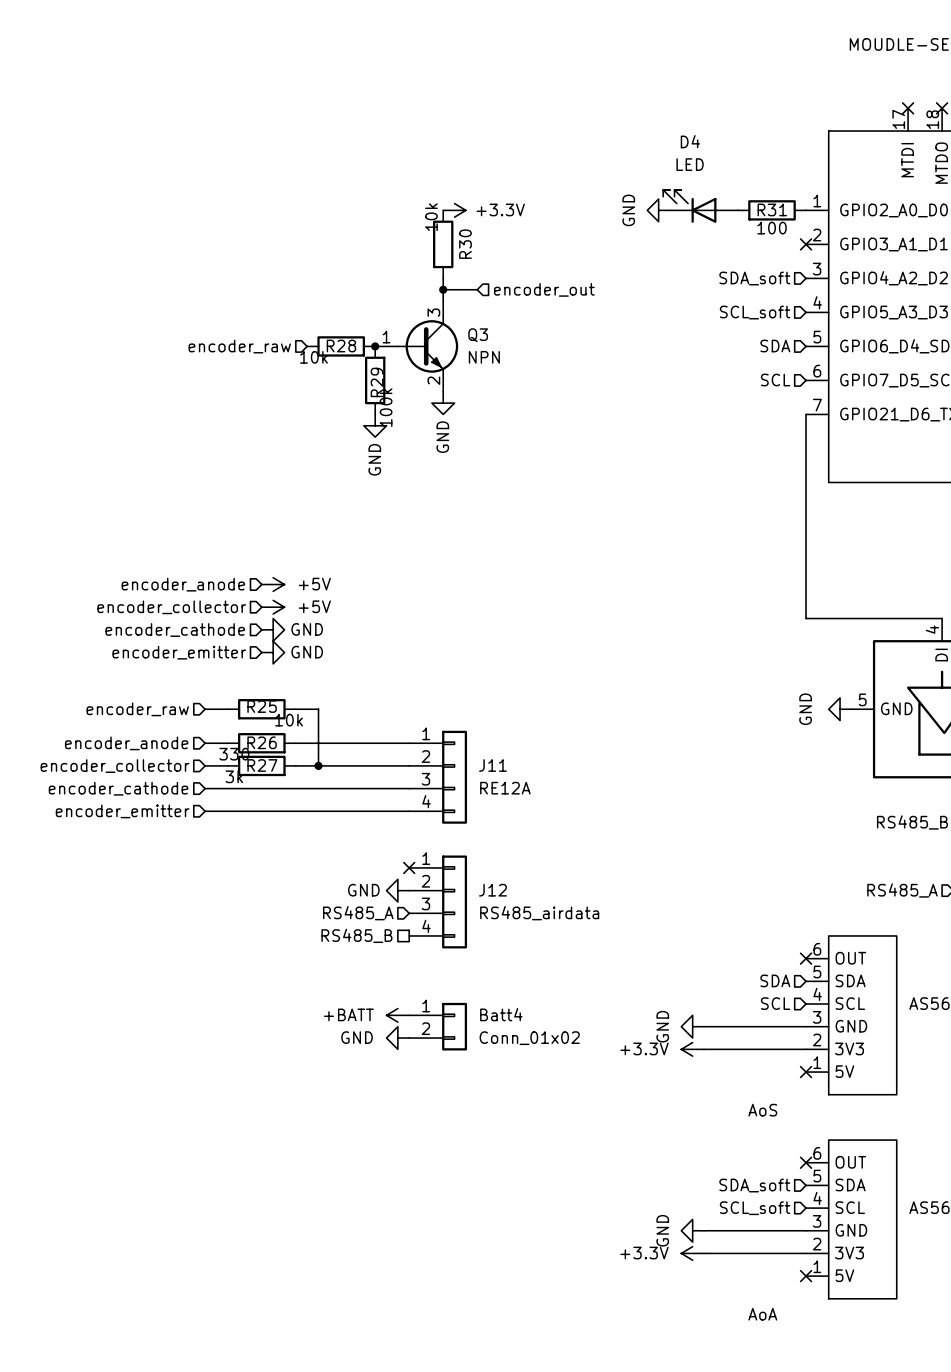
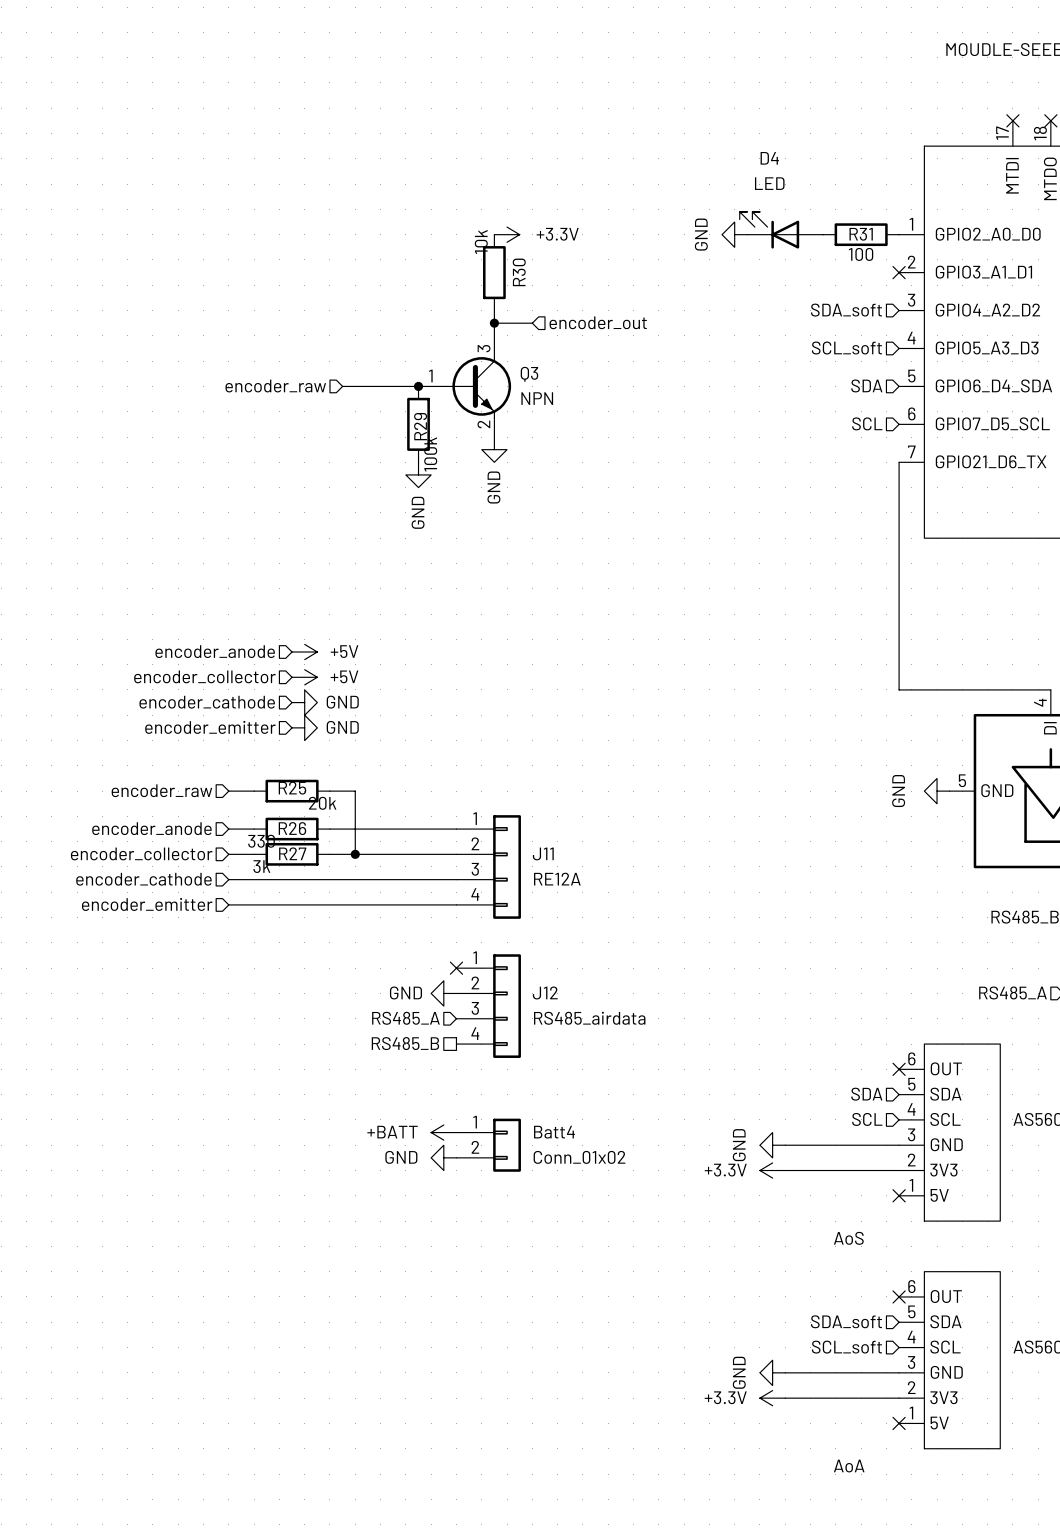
wire: none -> (342, 386) (418, 386)
R28: 10k (341, 346) -> none
R25 value: 10k (289, 720) -> 20k (322, 803)

